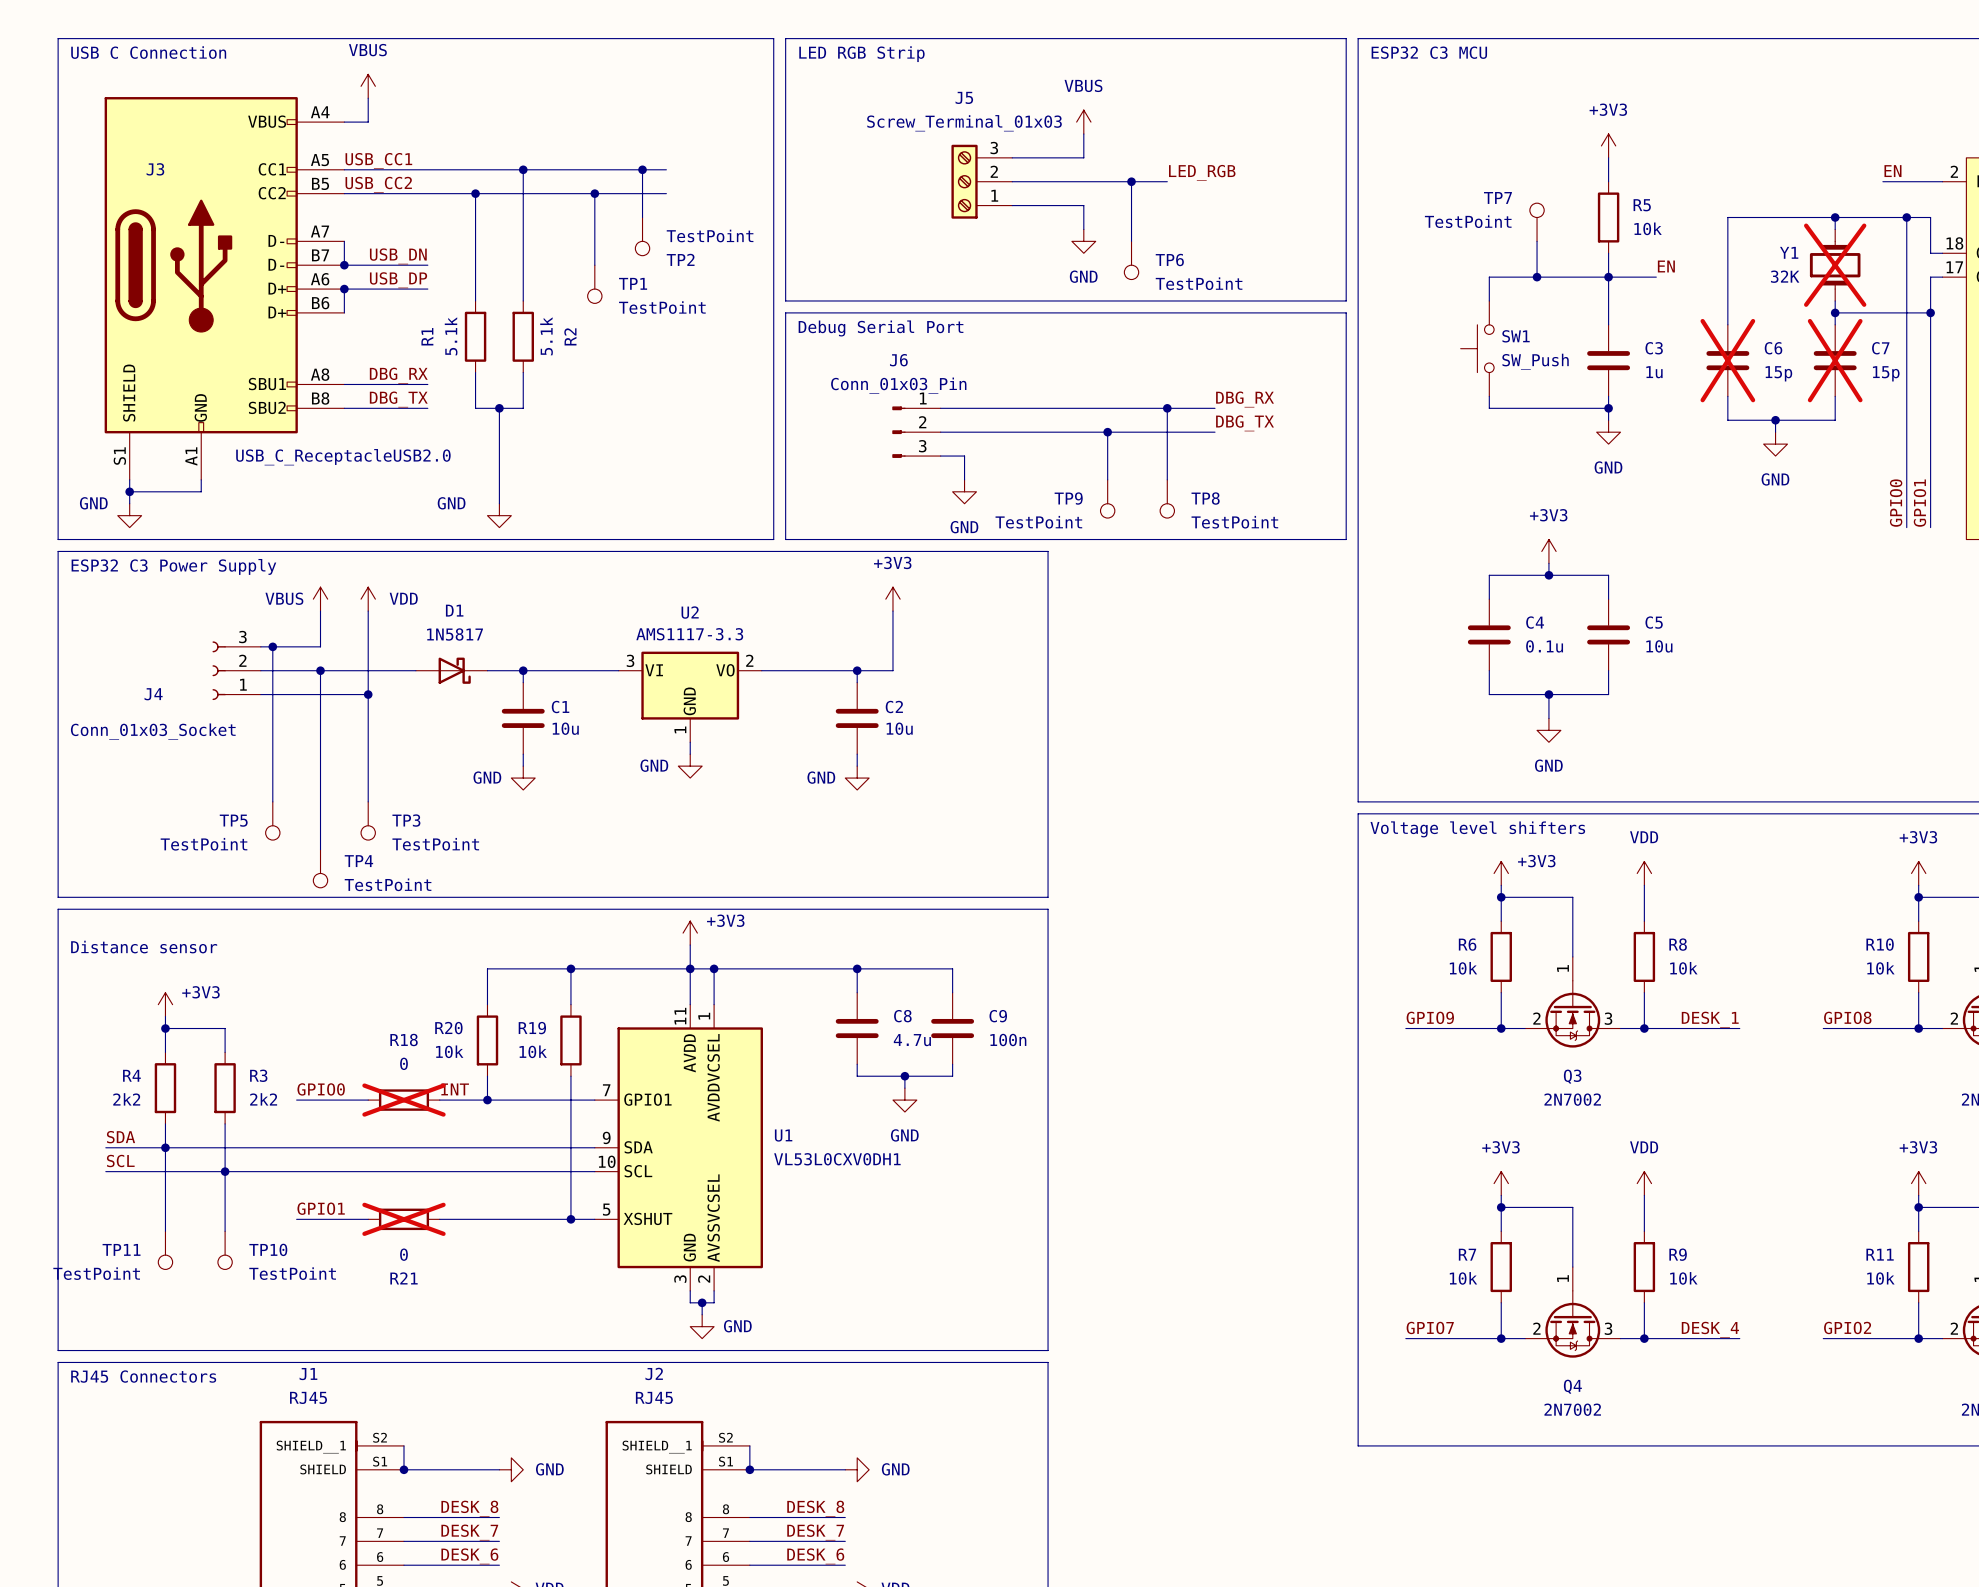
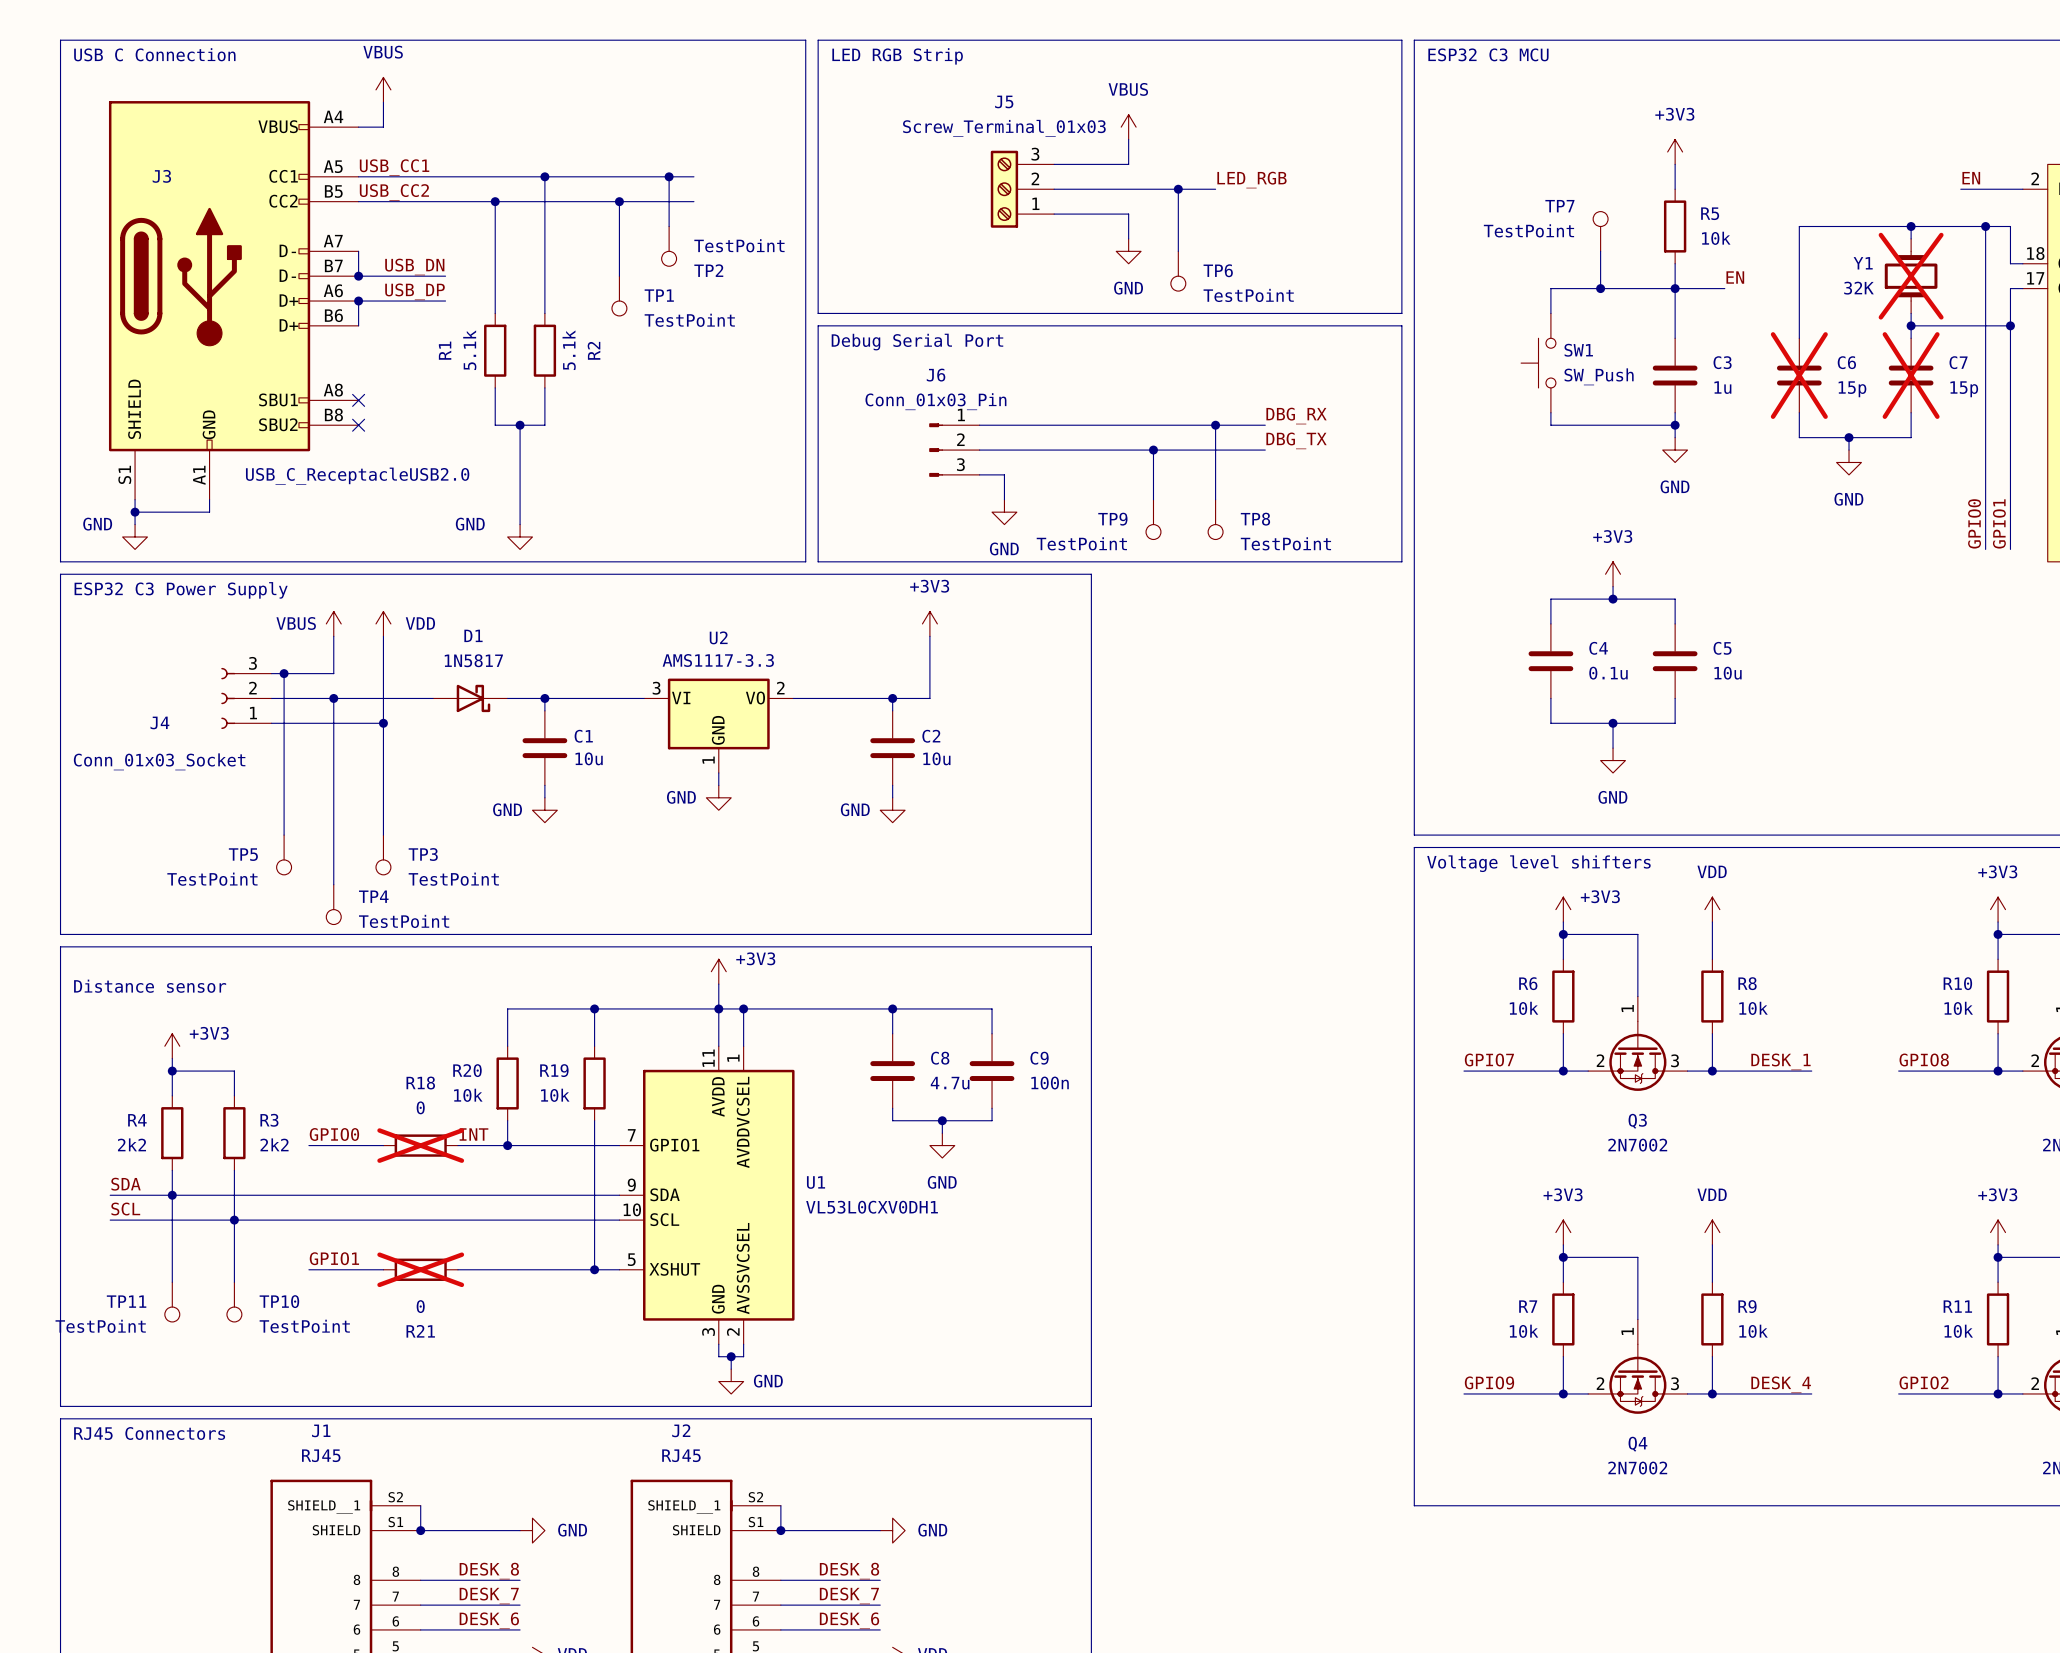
label: DBG_RX (398, 375) -> none
wire: (344, 384) (427, 384) -> none
no-connect mark: none -> (358, 400)
label: DBG_TX (398, 399) -> none
wire: (344, 408) (427, 408) -> none
no-connect mark: none -> (358, 425)
label: GPIO9 (1430, 1017) -> GPIO7 (1489, 1059)
label: GPIO7 (1430, 1327) -> GPIO9 (1489, 1382)

